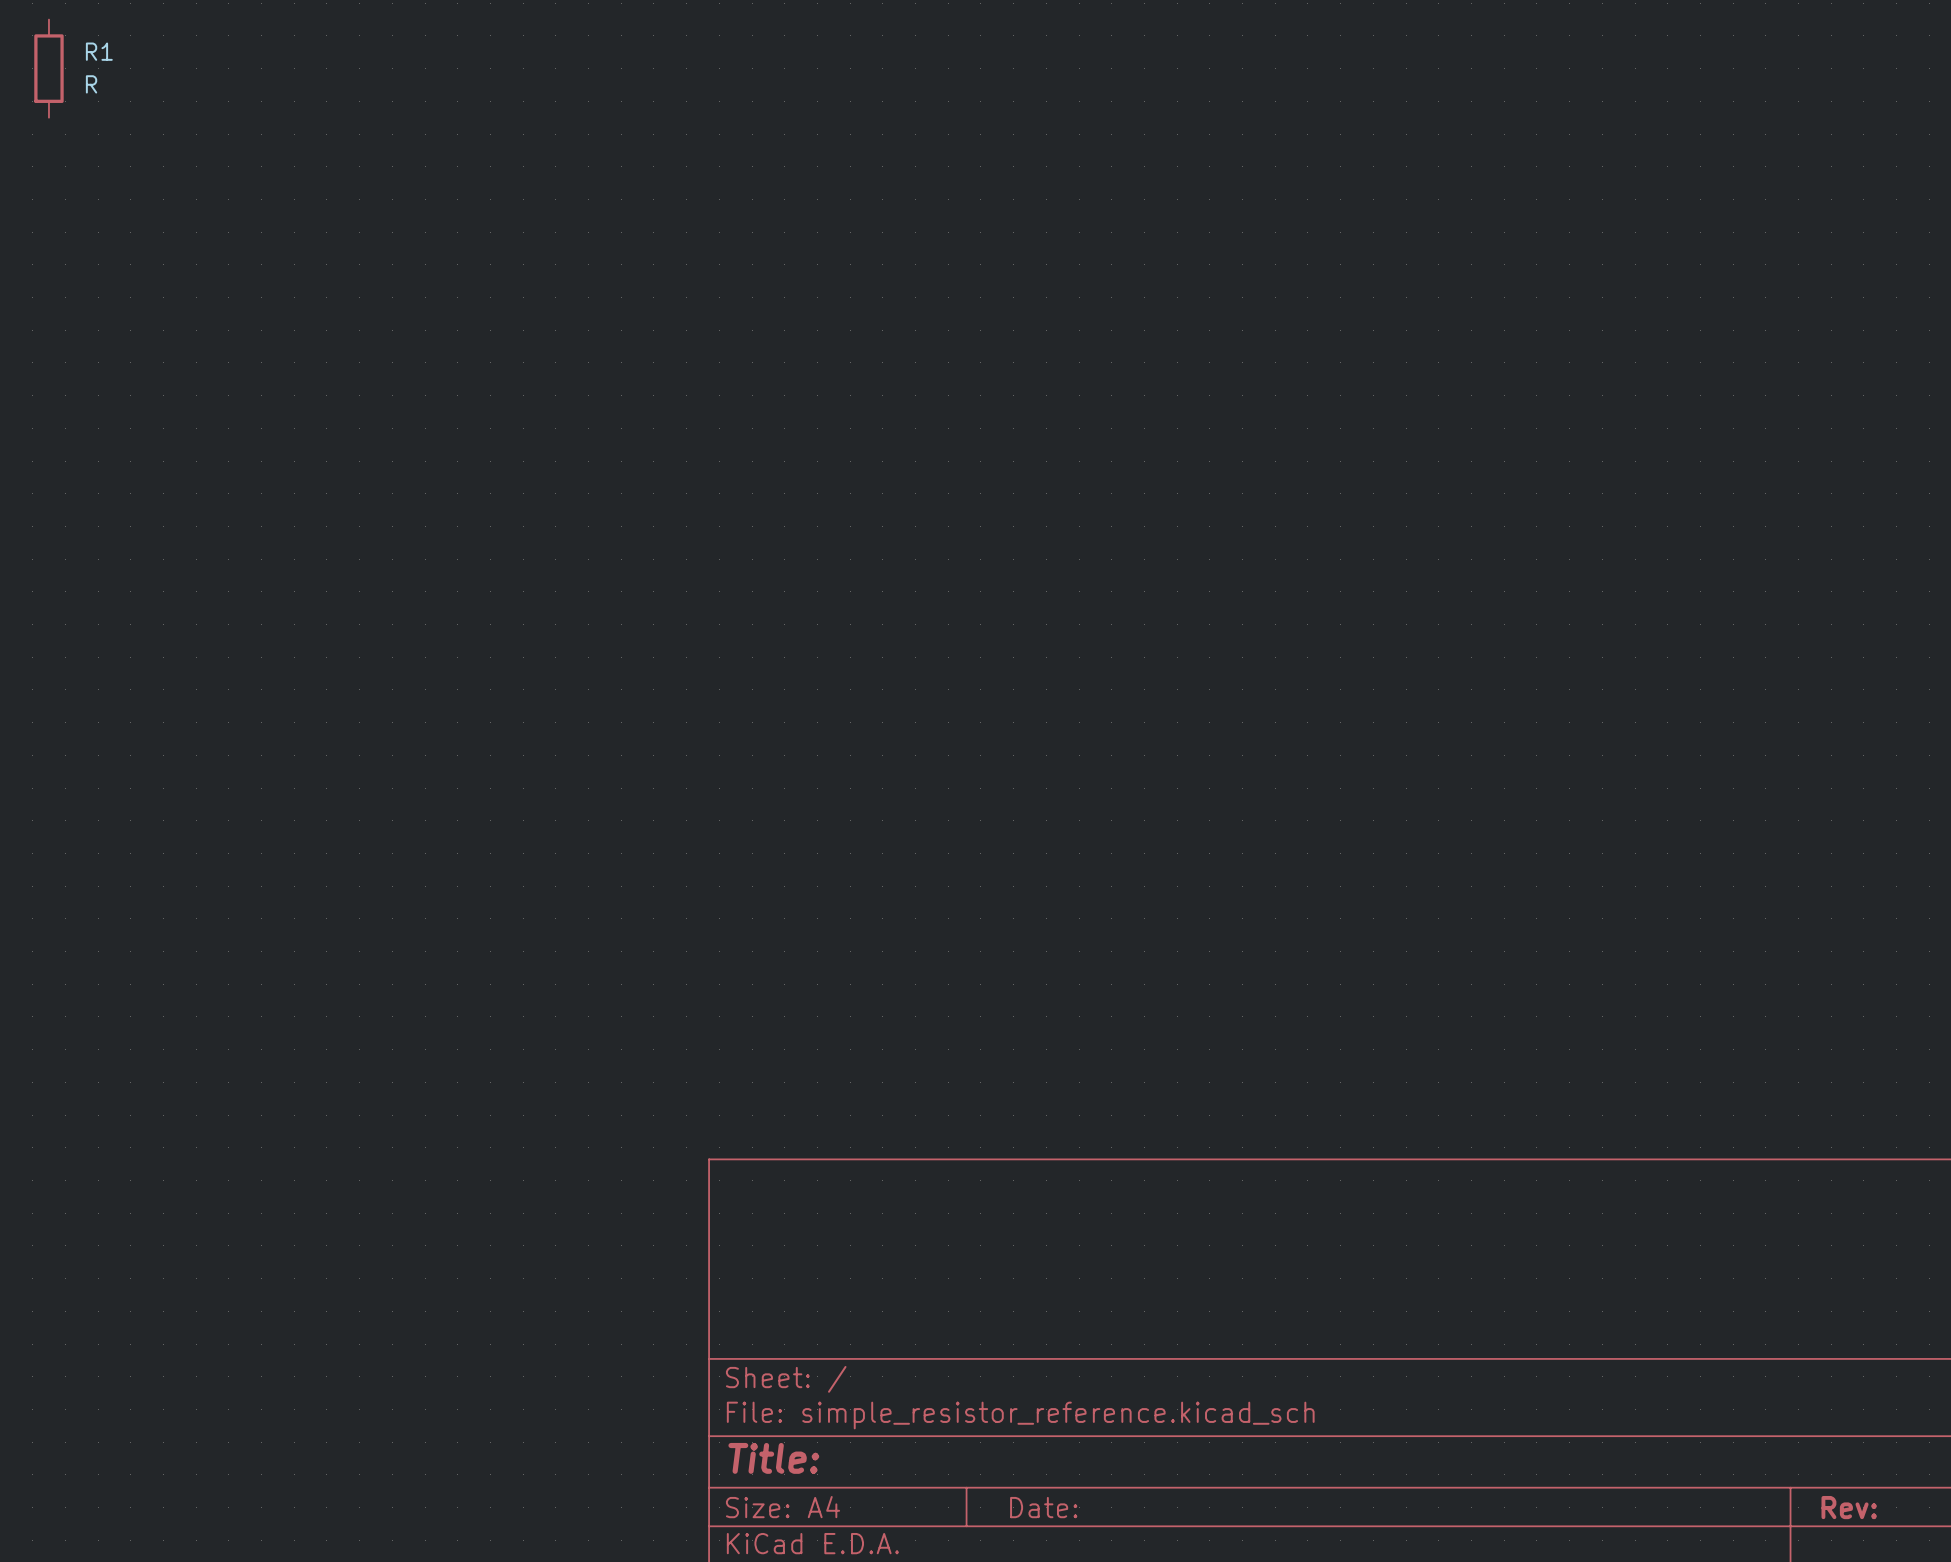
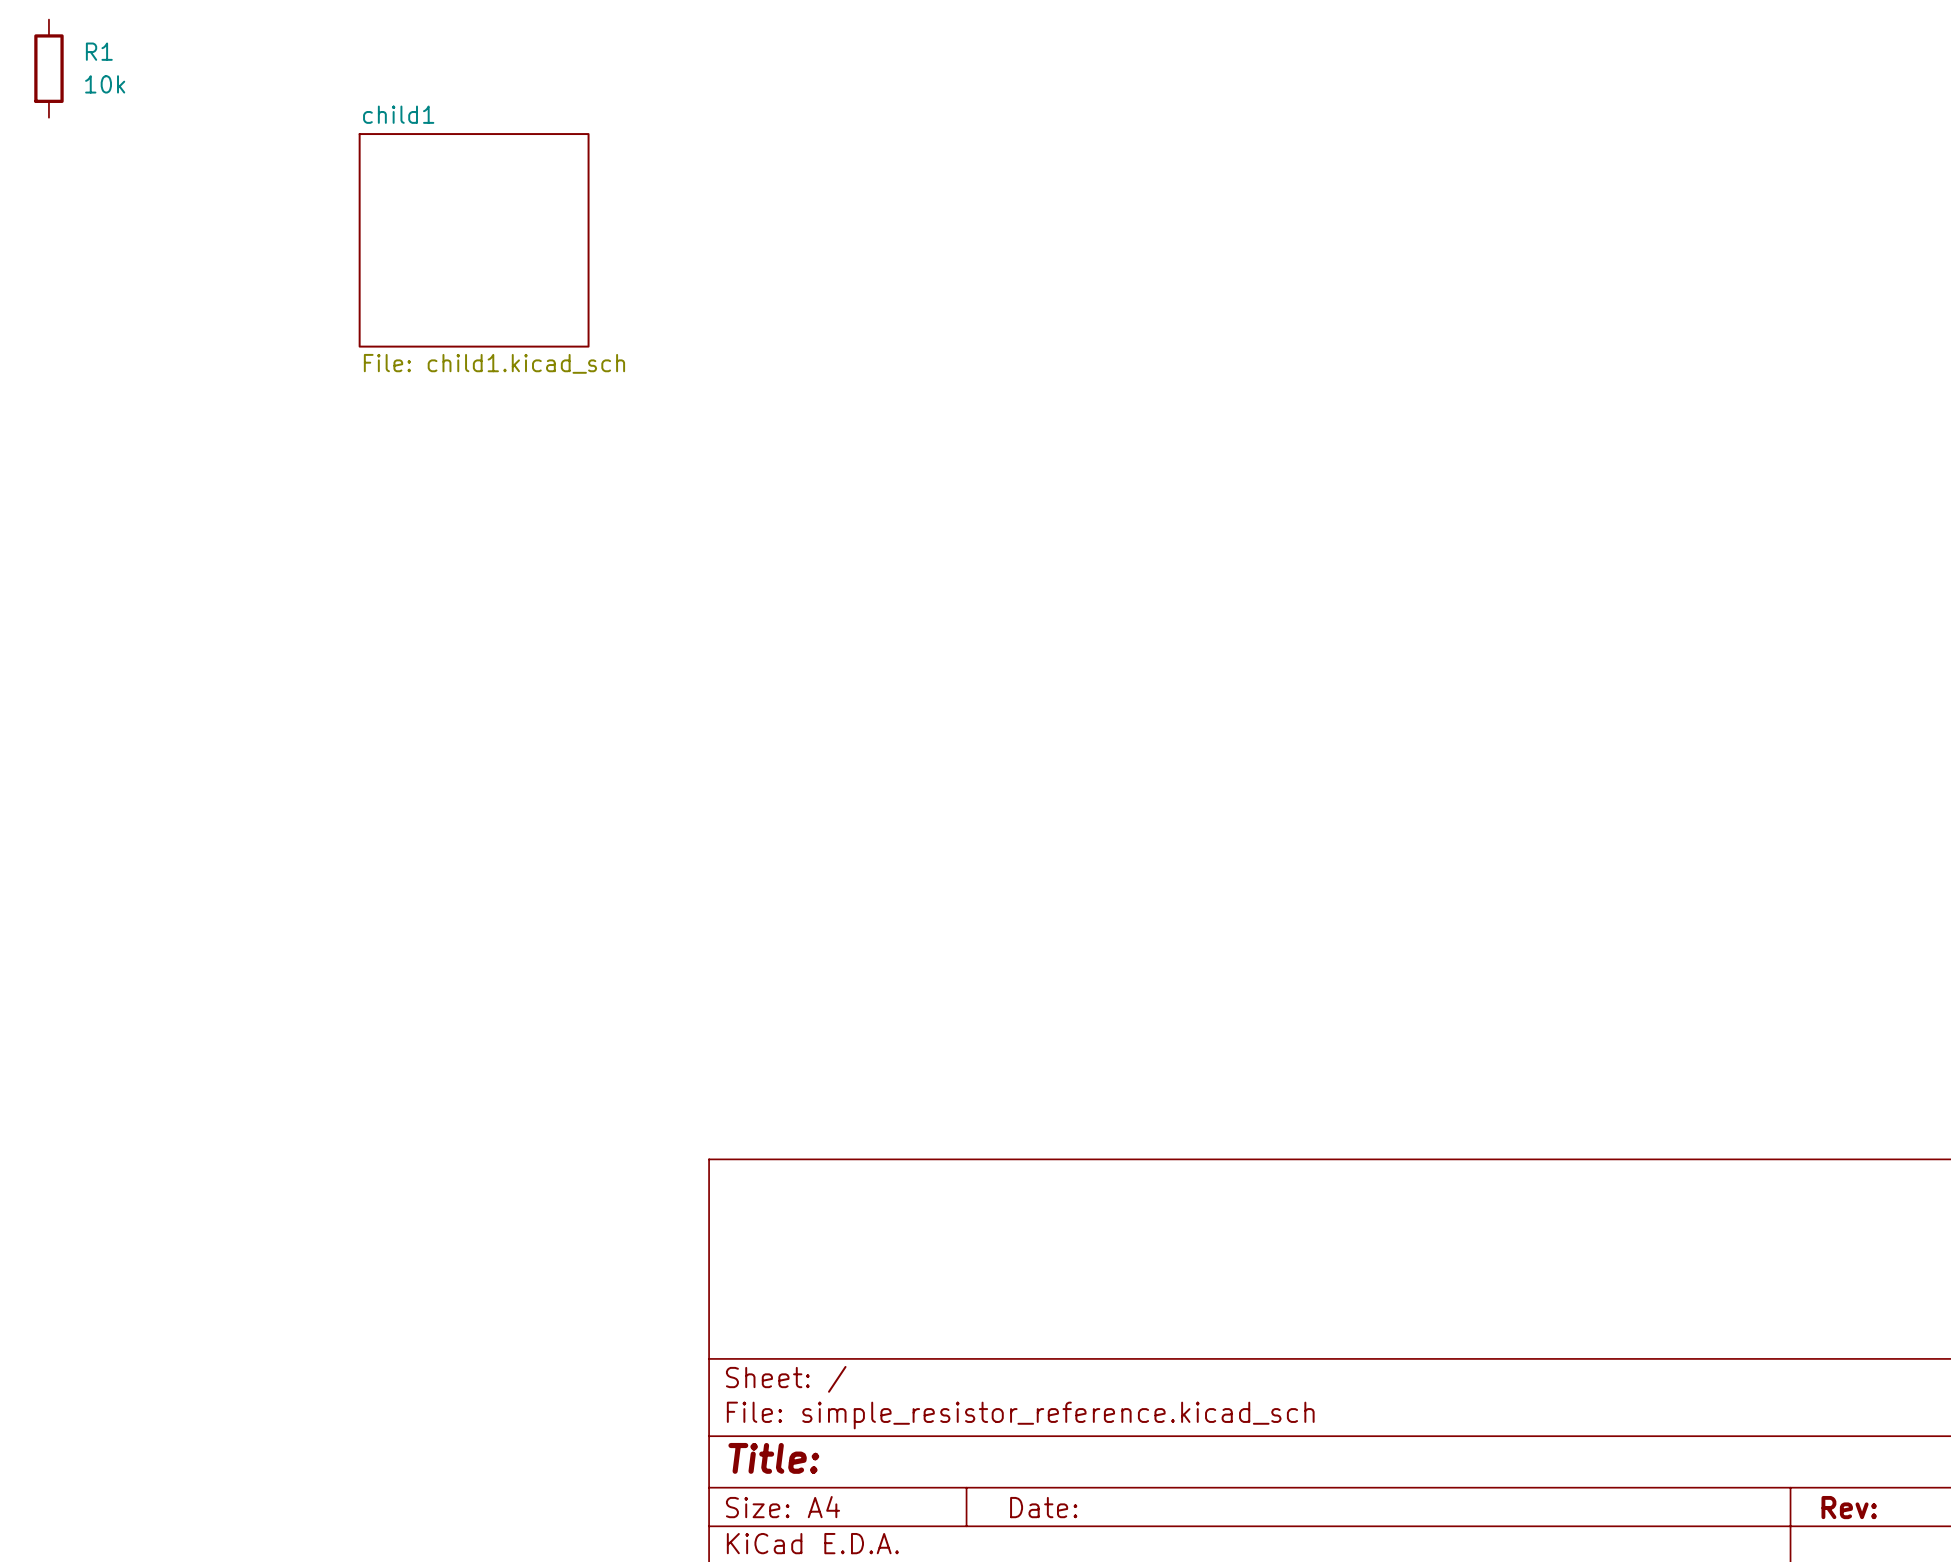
R1 value: R (91, 84) -> 10k (105, 84)
sheet child1: none -> File: child1.kicad_sch (474, 240)

